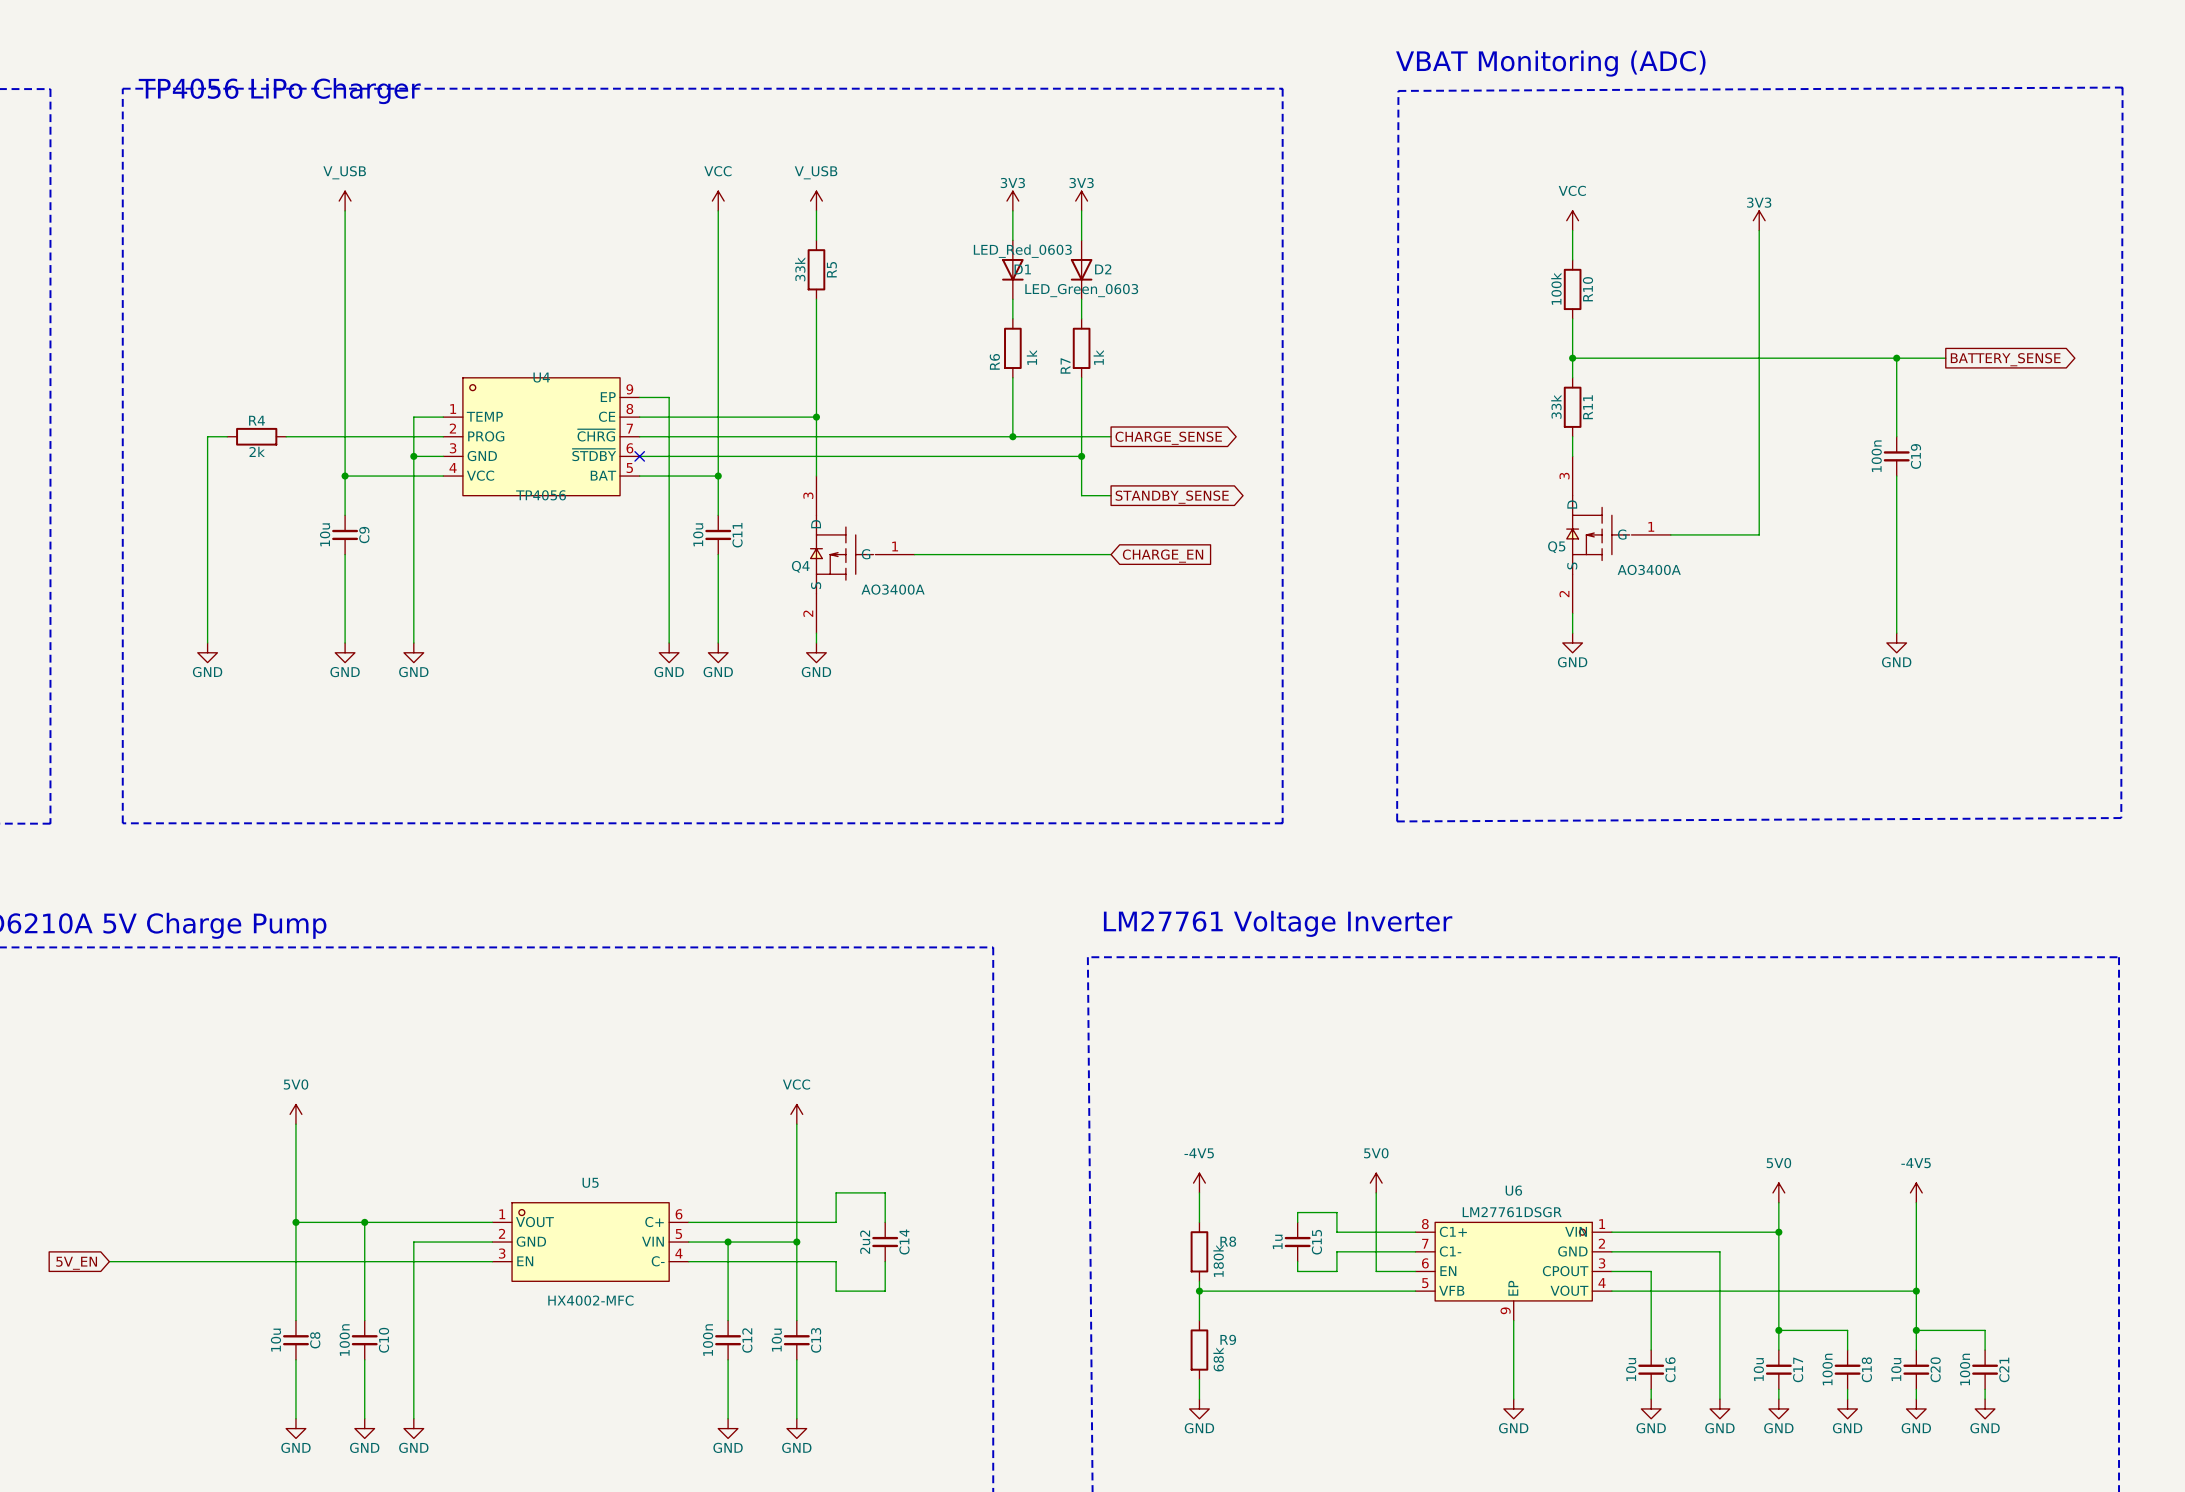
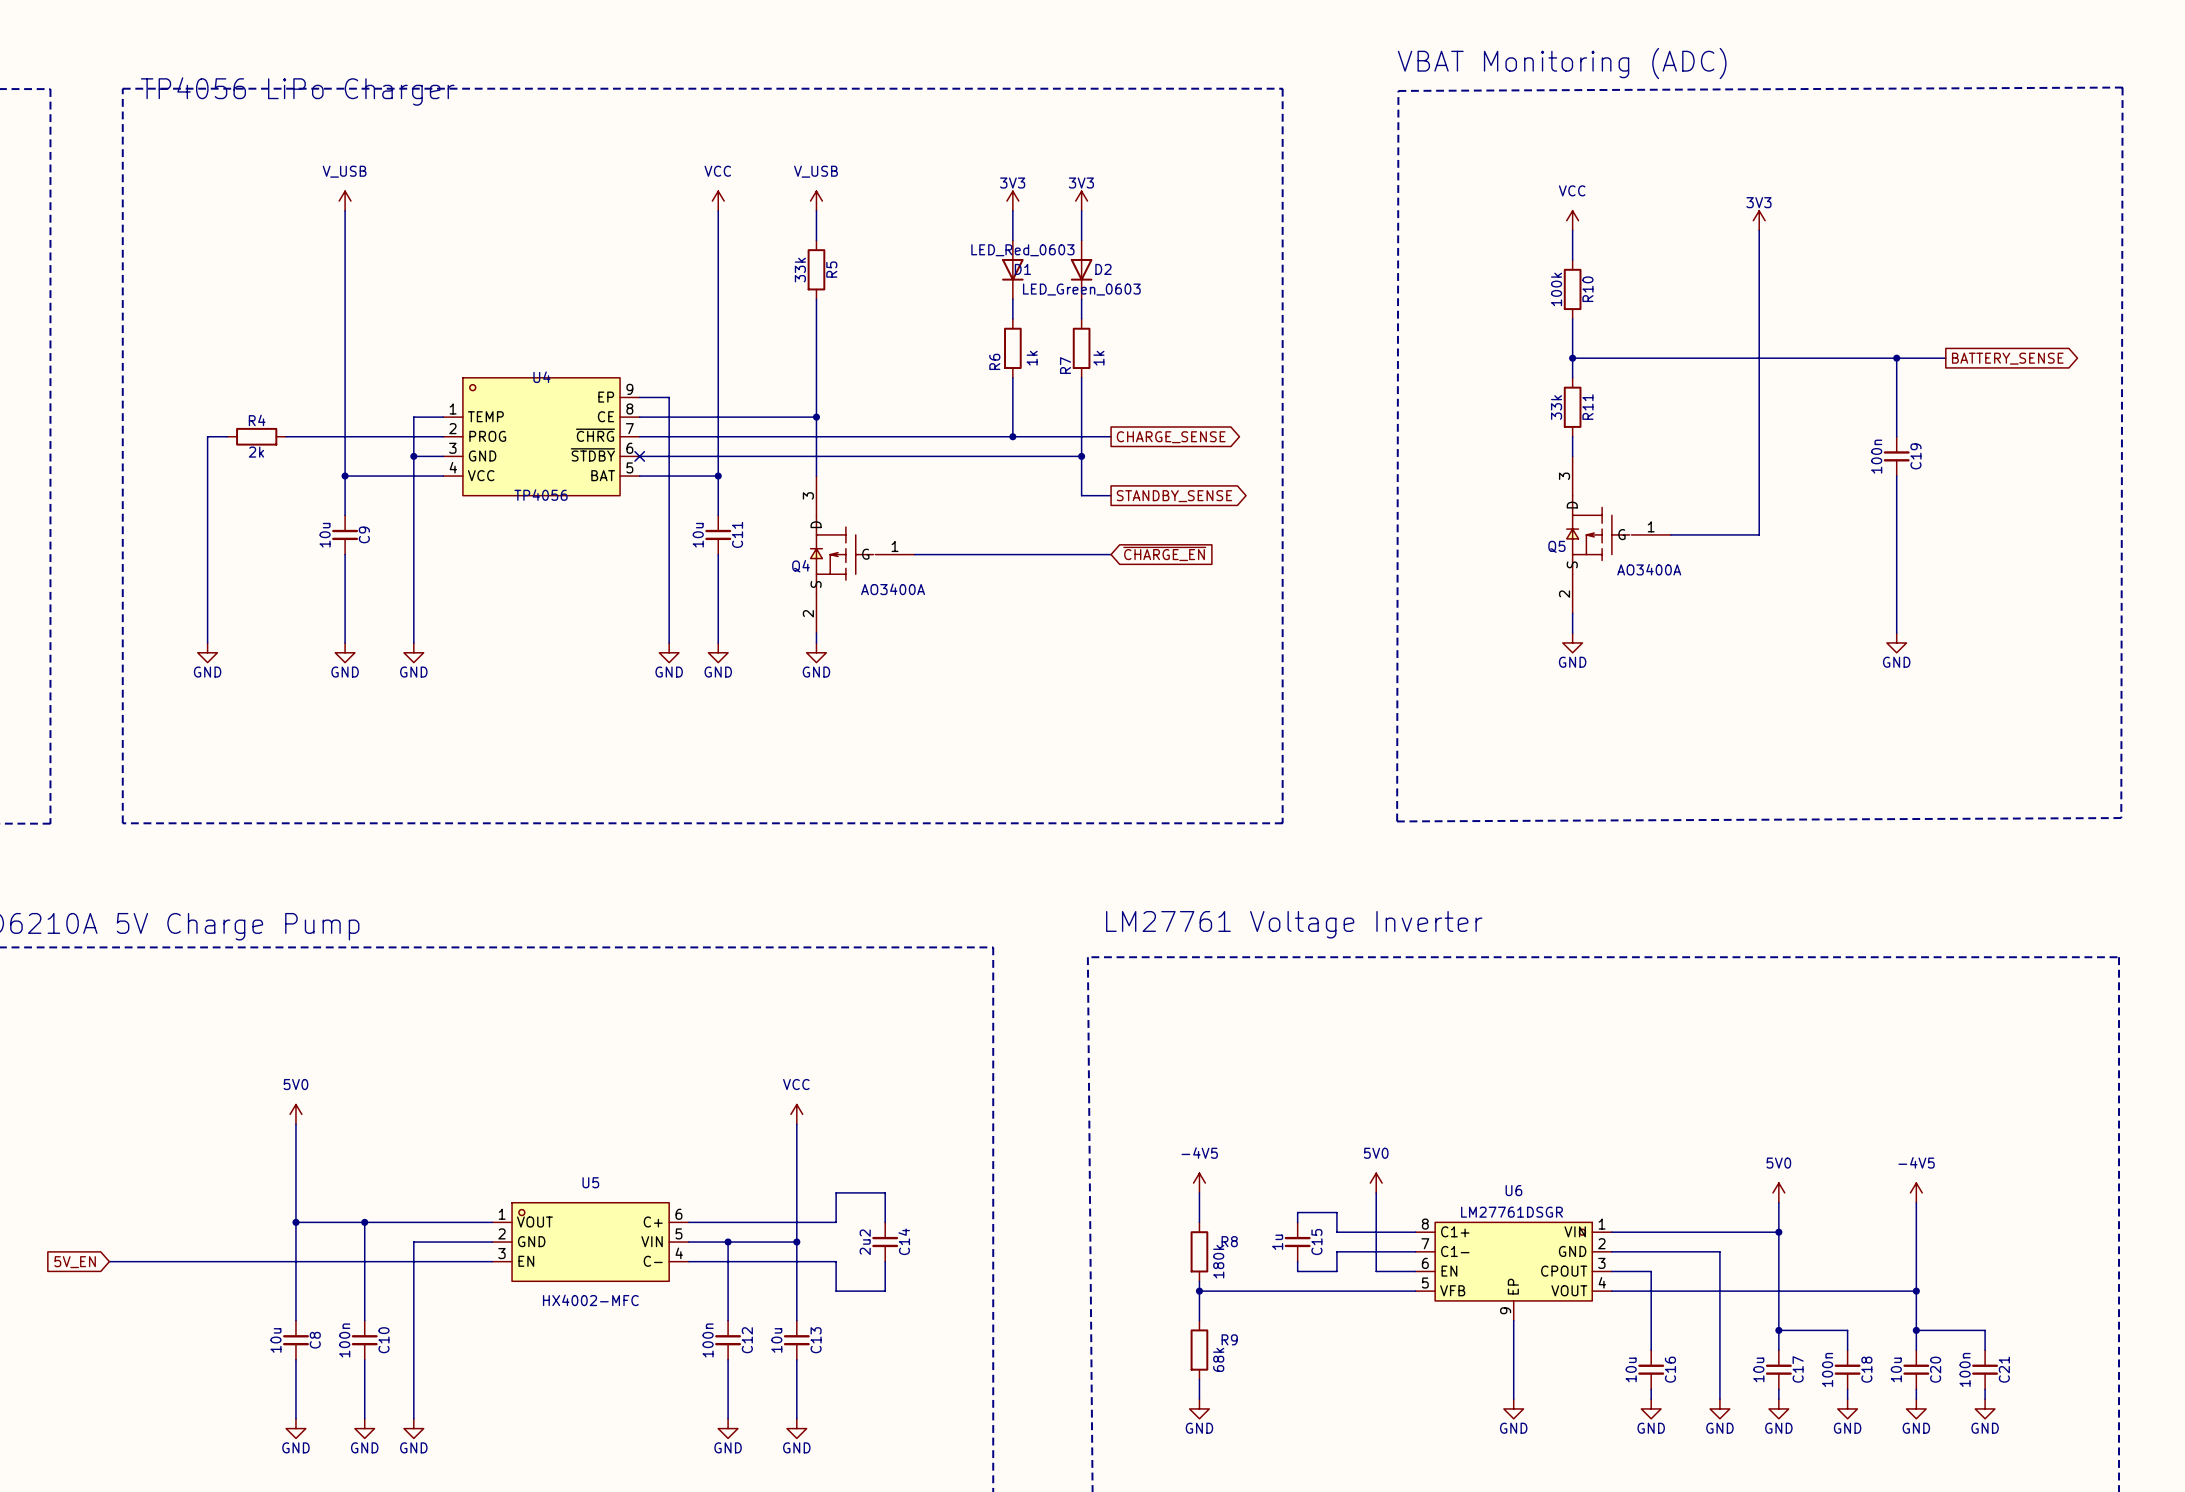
global label: CHARGE_EN (1163, 556) -> ~{CHARGE_EN} (1164, 553)

